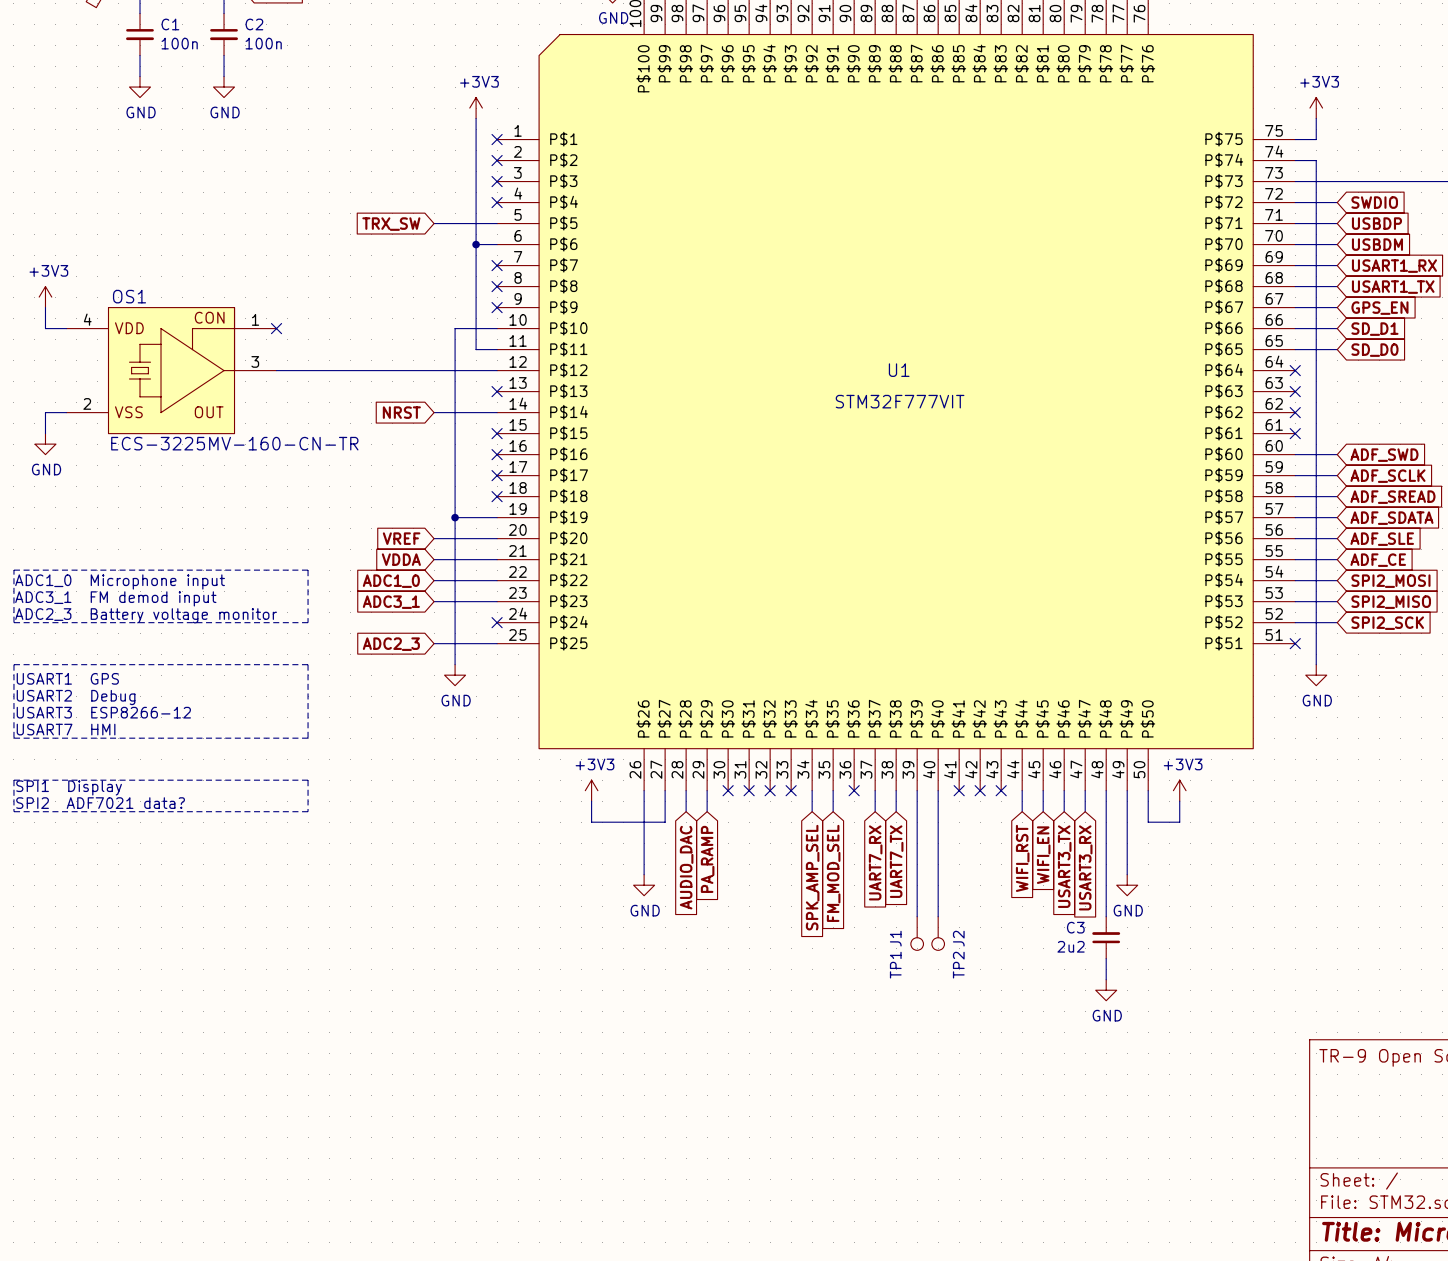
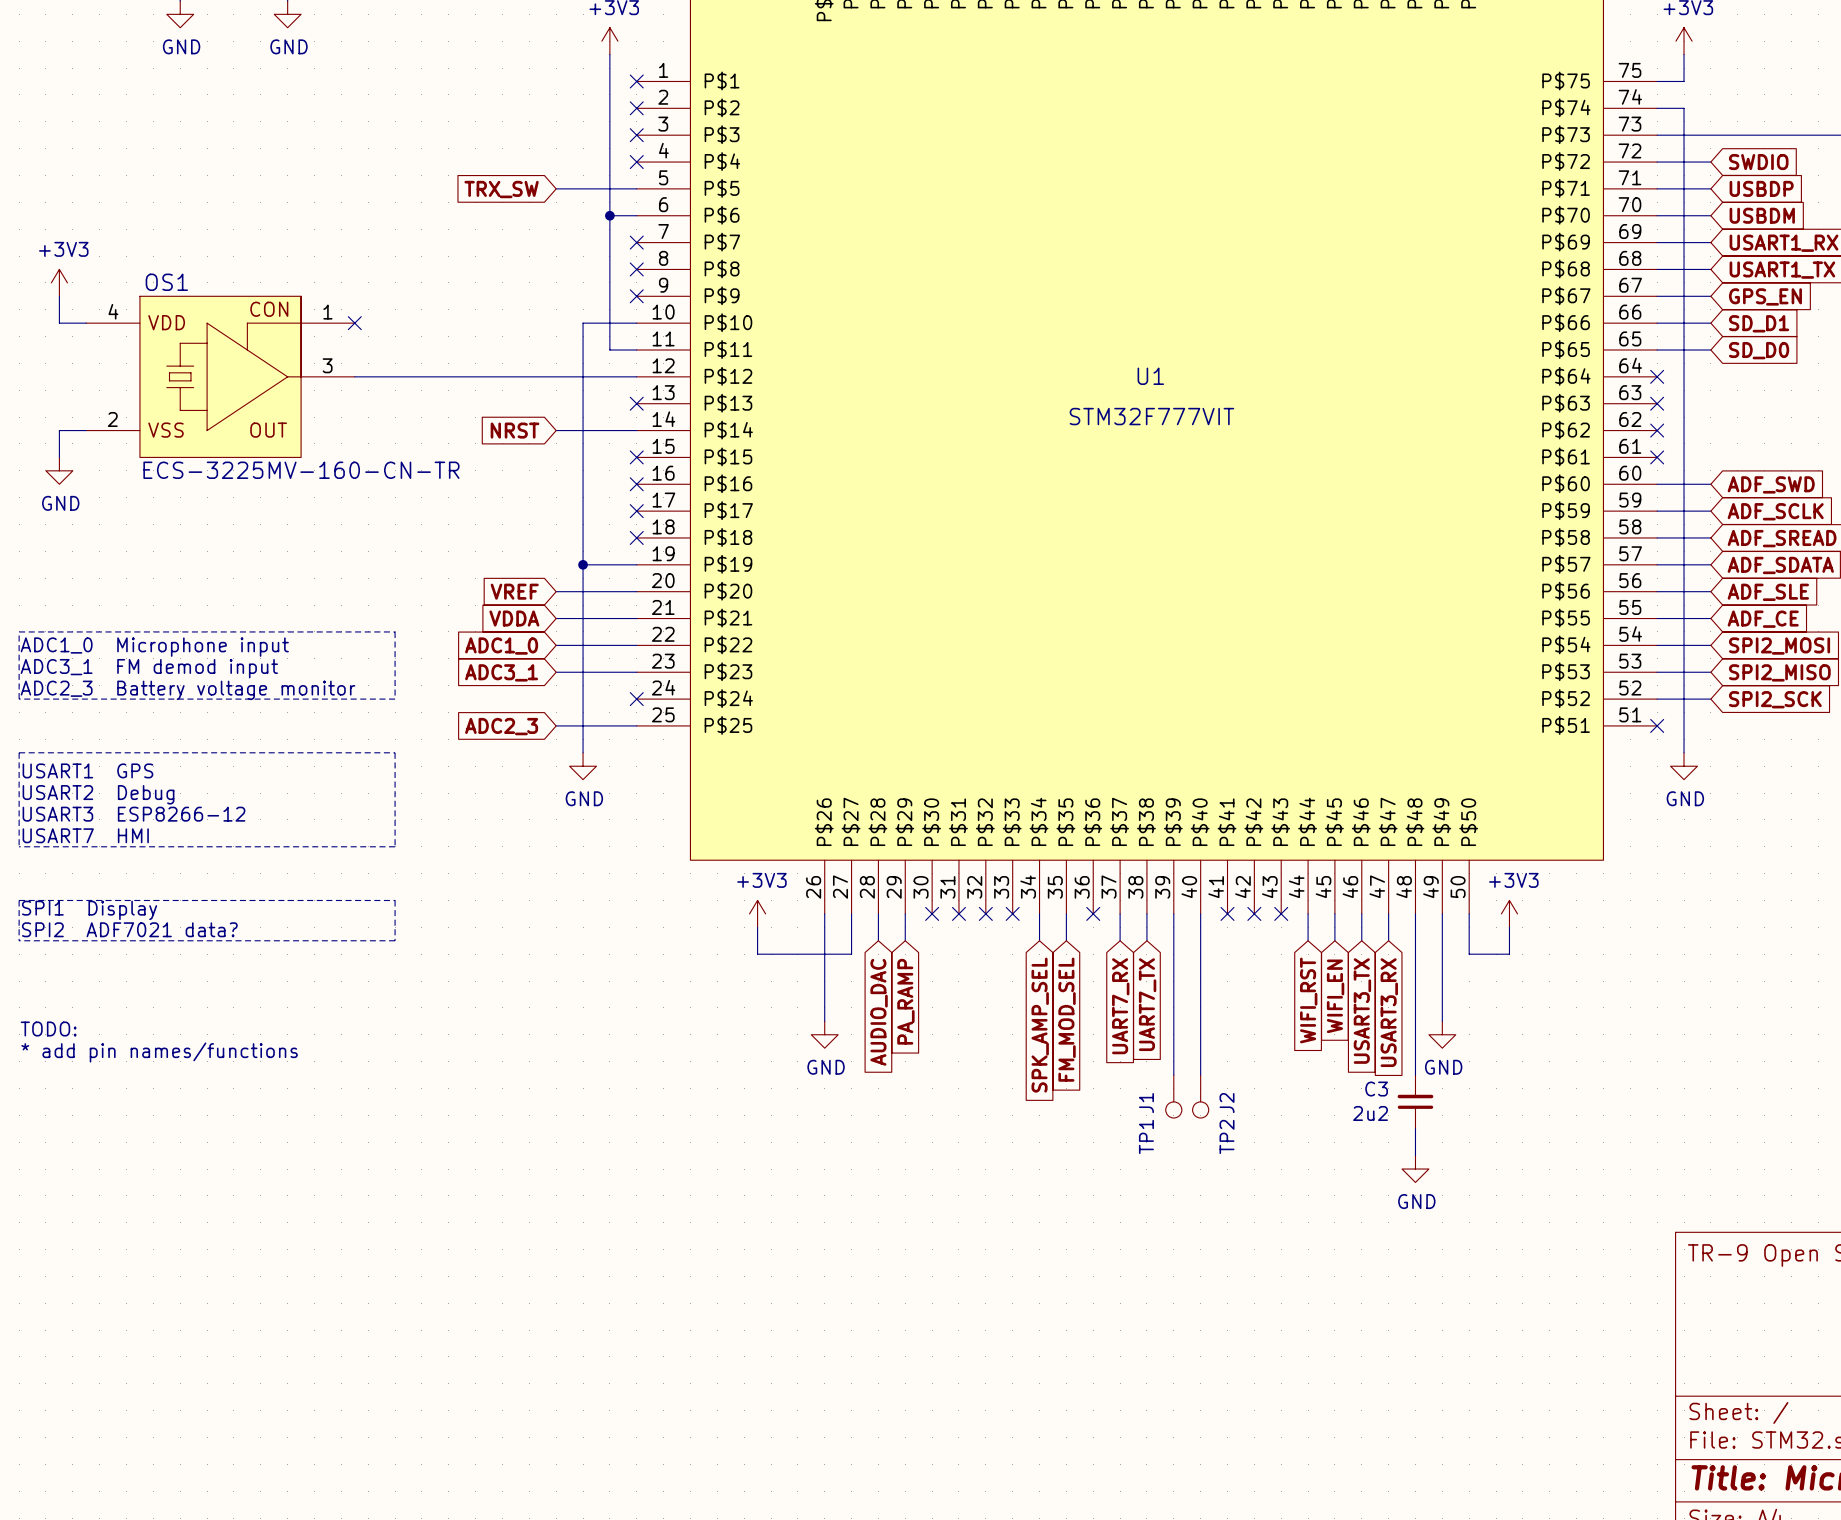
text: none -> TODO: (48, 1028)
text: none -> * add pin names/functions (159, 1052)

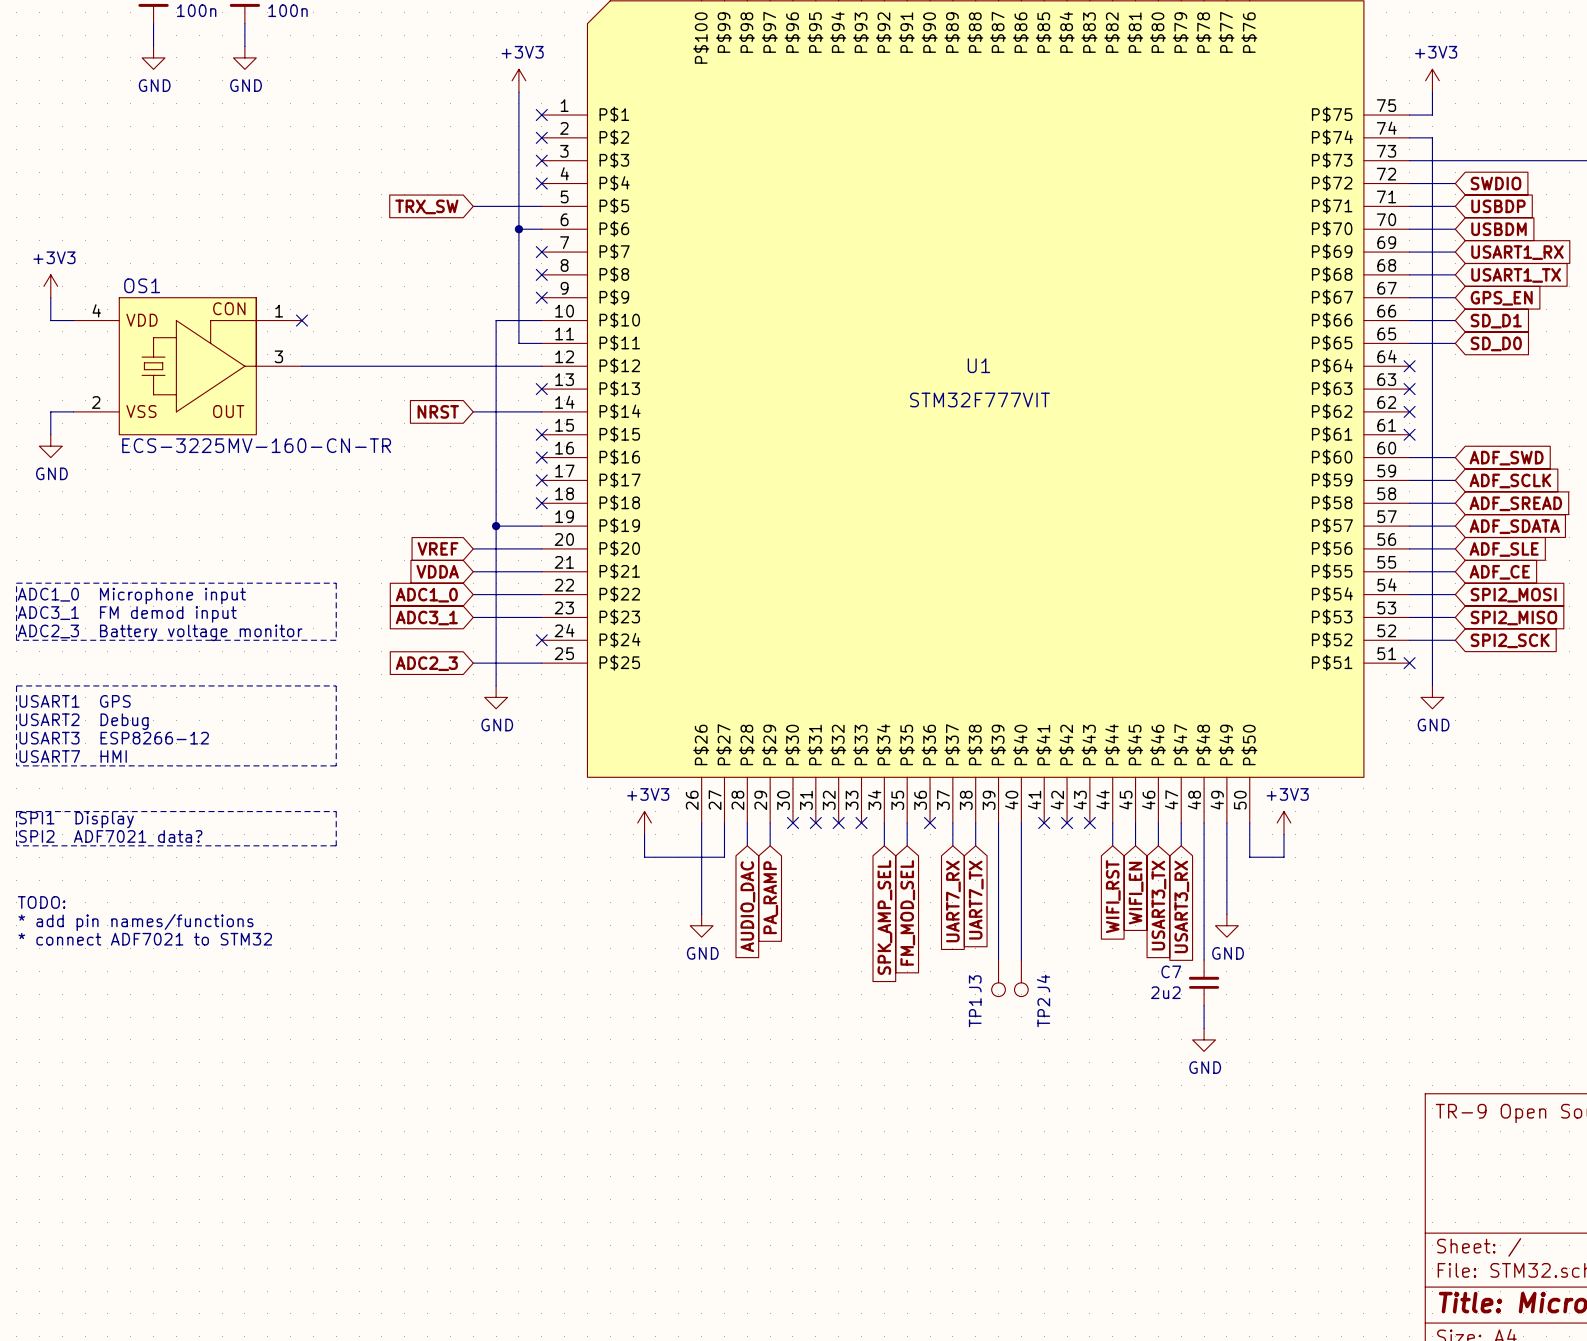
text: none -> TODO: (41, 902)
text: TODO: (48, 1028) -> * add pin names/functions (135, 922)
text: * add pin names/functions (159, 1052) -> * connect ADF7021 to STM32 (145, 939)
C3 name: C3 (1376, 1089) -> C7 (1171, 971)
J1 name: J1 (1146, 1103) -> J3 (975, 983)
J2 name: J2 (1227, 1103) -> J4 (1043, 983)

